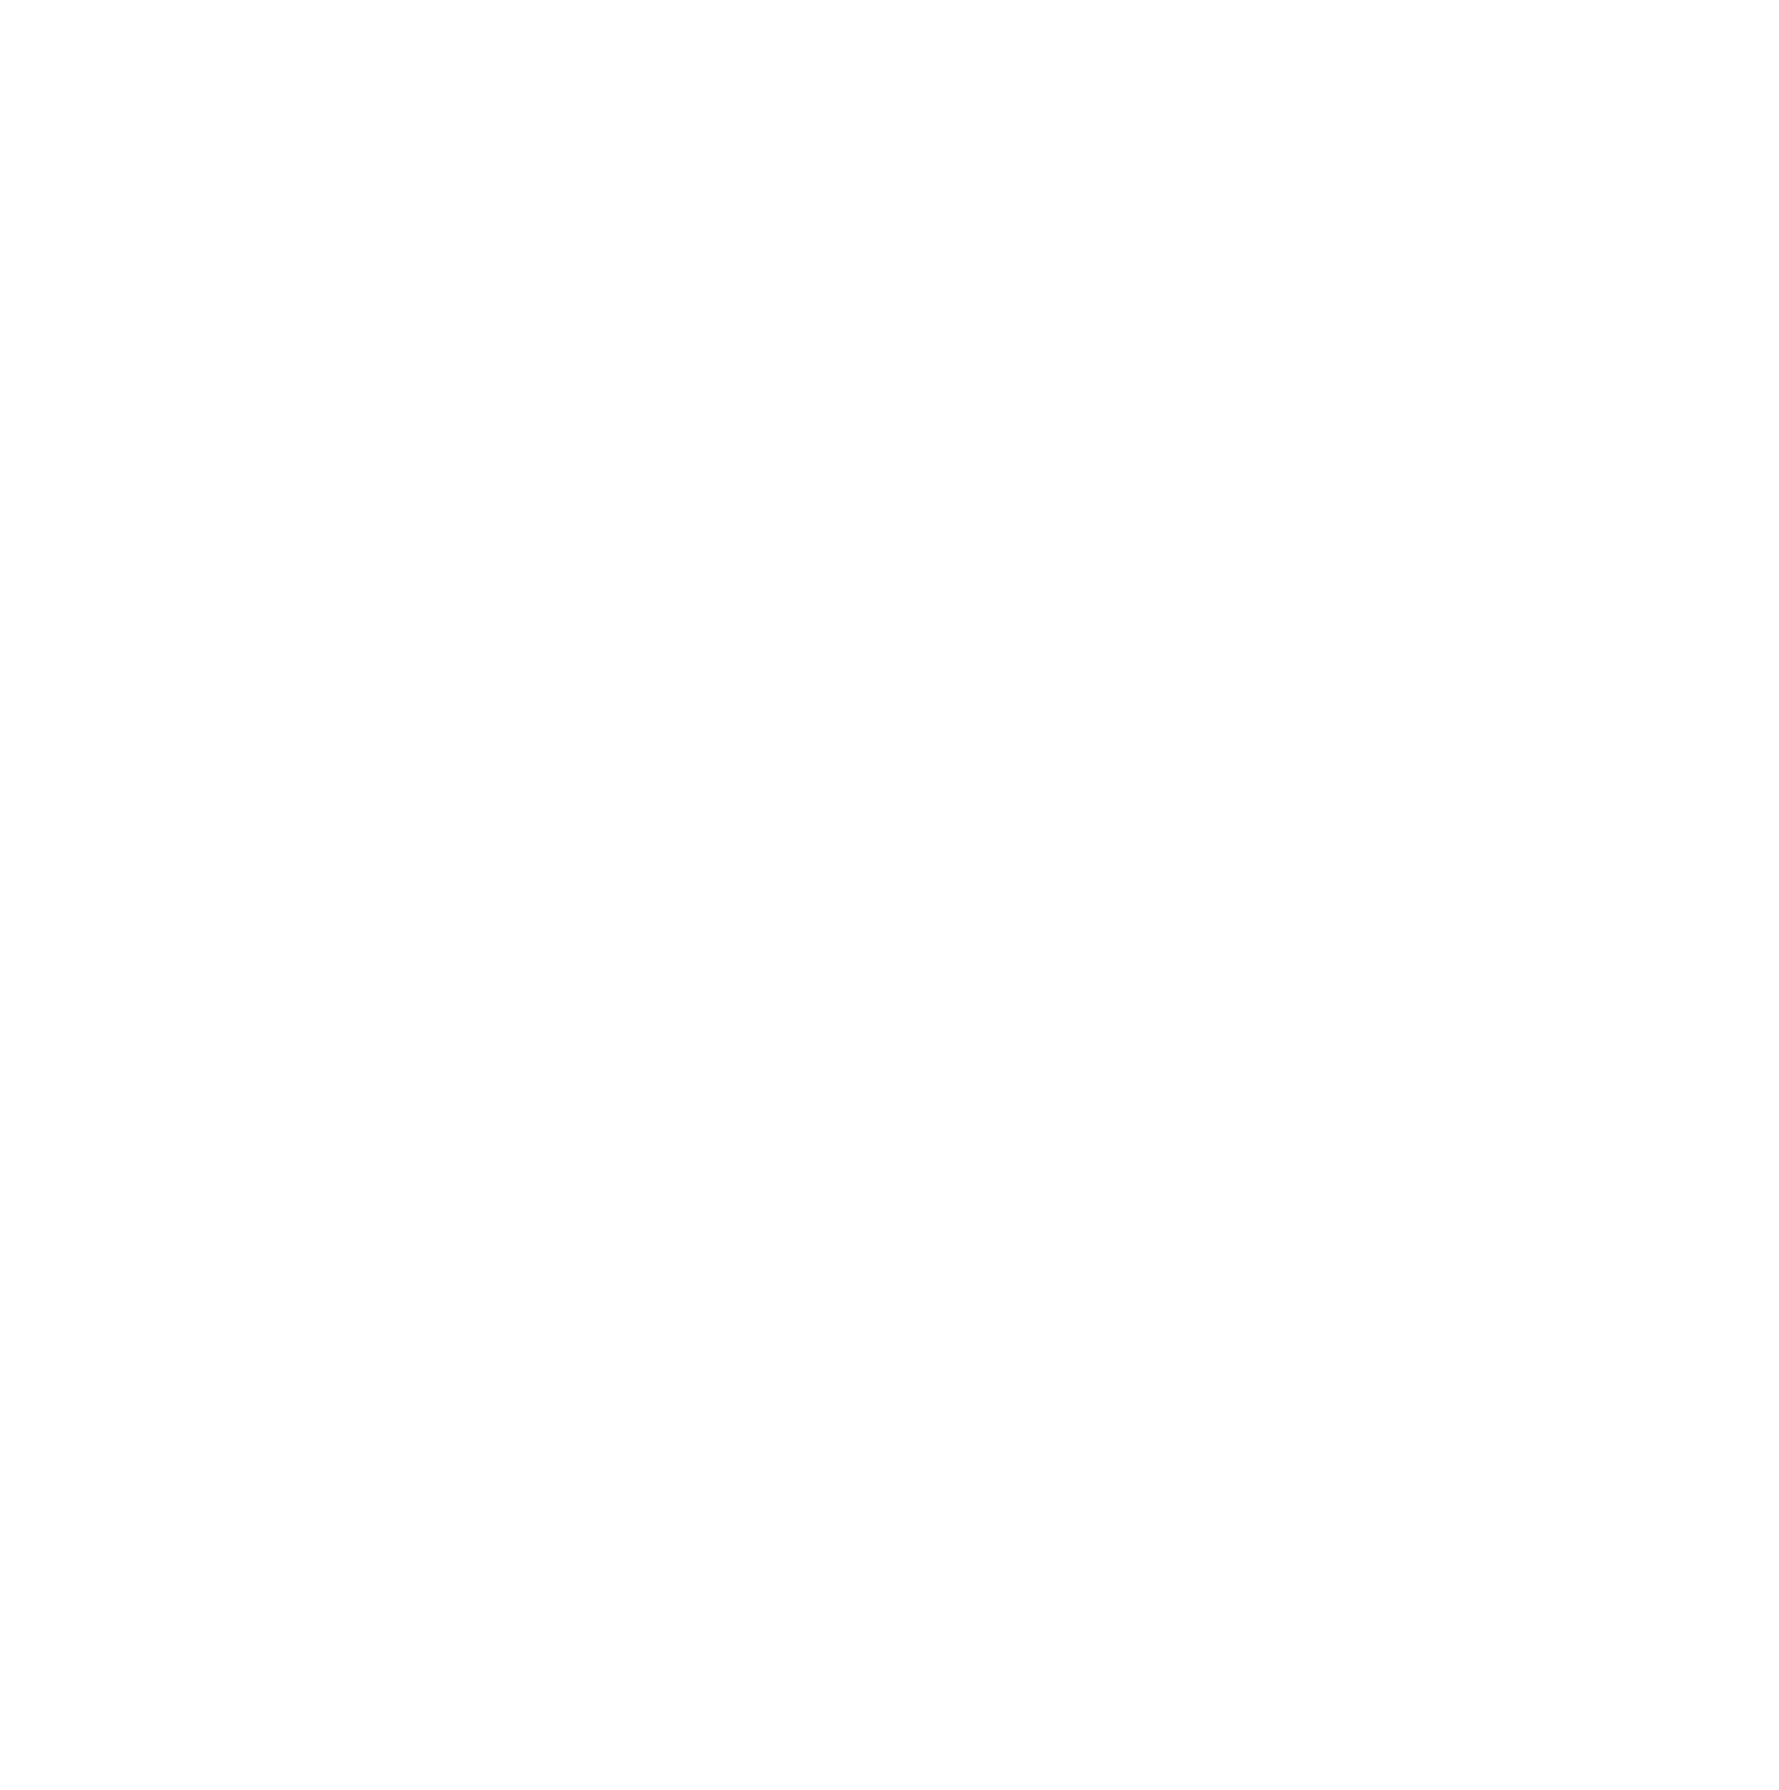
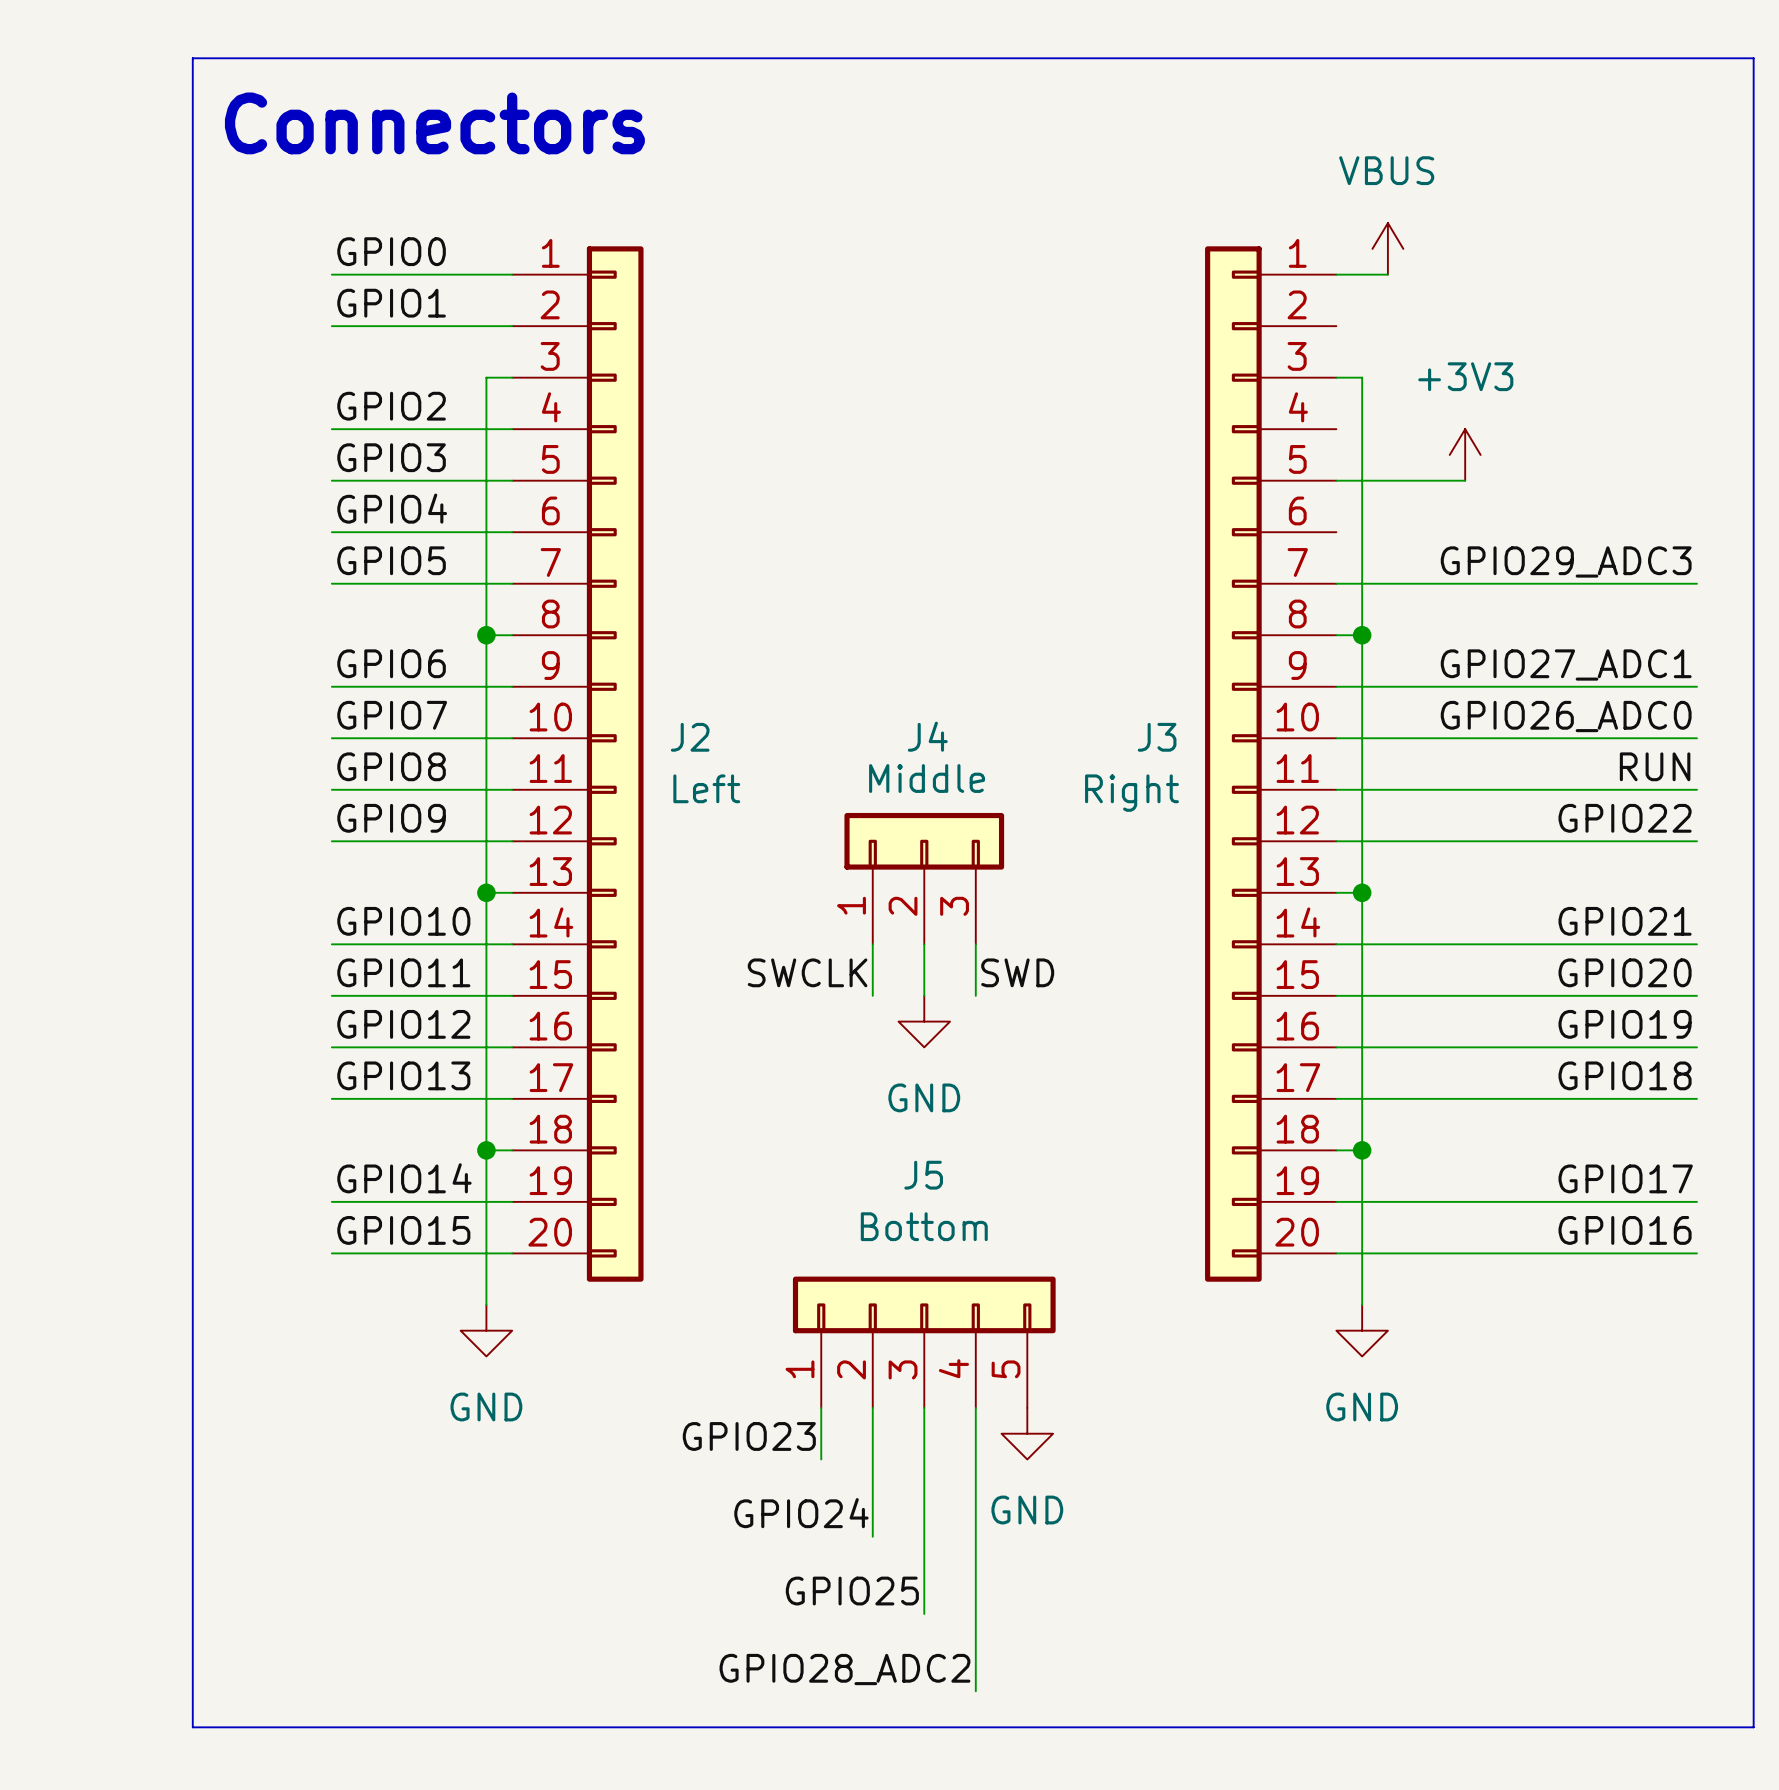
line: none -> (192, 58) (1753, 58) (1753, 1727) (192, 1727) (192, 58)
text: none -> Connectors (434, 123)
power symbol: none -> VBUS (1387, 248)
label: none -> GPIO0 (391, 251)
wire: none -> (331, 274) (512, 274)
wire: none -> (1336, 274) (1387, 274)
label: none -> GPIO1 (391, 303)
wire: none -> (331, 326) (512, 326)
wire: none -> (512, 377) (486, 377) (486, 1304)
wire: none -> (1336, 377) (1362, 377) (1362, 1304)
label: none -> GPIO2 (391, 406)
wire: none -> (331, 429) (512, 429)
power symbol: none -> +3V3 (1465, 454)
label: none -> GPIO3 (391, 457)
wire: none -> (331, 480) (512, 480)
wire: none -> (1336, 480) (1465, 480)
label: none -> GPIO4 (392, 508)
wire: none -> (331, 532) (512, 532)
label: none -> GPIO5 (391, 560)
label: none -> GPIO29_ADC3 (1566, 561)
wire: none -> (331, 583) (512, 583)
wire: none -> (1336, 583) (1696, 583)
wire: none -> (486, 635) (512, 635)
junction: none -> (486, 635)
wire: none -> (1336, 635) (1362, 635)
junction: none -> (1362, 635)
label: none -> GPIO6 (391, 663)
label: none -> GPIO27_ADC1 (1566, 664)
wire: none -> (331, 686) (512, 686)
wire: none -> (1336, 686) (1696, 686)
label: none -> GPIO7 (392, 715)
label: none -> GPIO26_ADC0 (1566, 716)
wire: none -> (331, 738) (512, 738)
wire: none -> (1336, 738) (1696, 738)
J2: none -> Left (577, 764)
J3: none -> Right (1270, 764)
label: none -> GPIO8 (391, 766)
label: none -> RUN (1655, 766)
wire: none -> (331, 789) (512, 789)
wire: none -> (1336, 789) (1696, 789)
label: none -> GPIO9 (391, 818)
label: none -> GPIO22 (1625, 818)
wire: none -> (331, 841) (512, 841)
wire: none -> (1336, 841) (1696, 841)
J4: none -> Middle (924, 878)
wire: none -> (486, 892) (512, 892)
junction: none -> (486, 892)
wire: none -> (1336, 892) (1362, 892)
junction: none -> (1362, 892)
label: none -> GPIO10 (403, 921)
label: none -> GPIO21 (1625, 921)
wire: none -> (331, 944) (512, 944)
wire: none -> (872, 944) (872, 995)
wire: none -> (924, 944) (924, 995)
wire: none -> (975, 944) (975, 995)
wire: none -> (1336, 944) (1696, 944)
label: none -> GPIO11 (403, 972)
label: none -> SWCLK (807, 972)
label: none -> SWD (1017, 972)
label: none -> GPIO20 (1625, 972)
wire: none -> (331, 995) (512, 995)
wire: none -> (1336, 995) (1696, 995)
power symbol: none -> GND (924, 1021)
label: none -> GPIO12 (403, 1024)
label: none -> GPIO19 (1625, 1024)
wire: none -> (331, 1047) (512, 1047)
wire: none -> (1336, 1047) (1696, 1047)
label: none -> GPIO13 (403, 1075)
label: none -> GPIO18 (1625, 1075)
wire: none -> (331, 1098) (512, 1098)
wire: none -> (1336, 1098) (1696, 1098)
wire: none -> (486, 1150) (512, 1150)
junction: none -> (486, 1150)
wire: none -> (1336, 1150) (1362, 1150)
junction: none -> (1362, 1150)
label: none -> GPIO14 (404, 1178)
label: none -> GPIO17 (1625, 1178)
wire: none -> (331, 1201) (512, 1201)
wire: none -> (1336, 1201) (1696, 1201)
label: none -> GPIO15 (403, 1230)
label: none -> GPIO16 (1625, 1230)
wire: none -> (331, 1253) (512, 1253)
wire: none -> (1336, 1253) (1696, 1253)
power symbol: none -> GND (486, 1330)
power symbol: none -> GND (1362, 1330)
J5: none -> Bottom (924, 1342)
wire: none -> (821, 1407) (821, 1459)
wire: none -> (872, 1407) (872, 1536)
wire: none -> (924, 1407) (924, 1614)
wire: none -> (975, 1407) (975, 1691)
power symbol: none -> GND (1027, 1433)
label: none -> GPIO23 (749, 1436)
label: none -> GPIO24 (801, 1513)
label: none -> GPIO25 (852, 1591)
label: none -> GPIO28_ADC2 (844, 1669)

